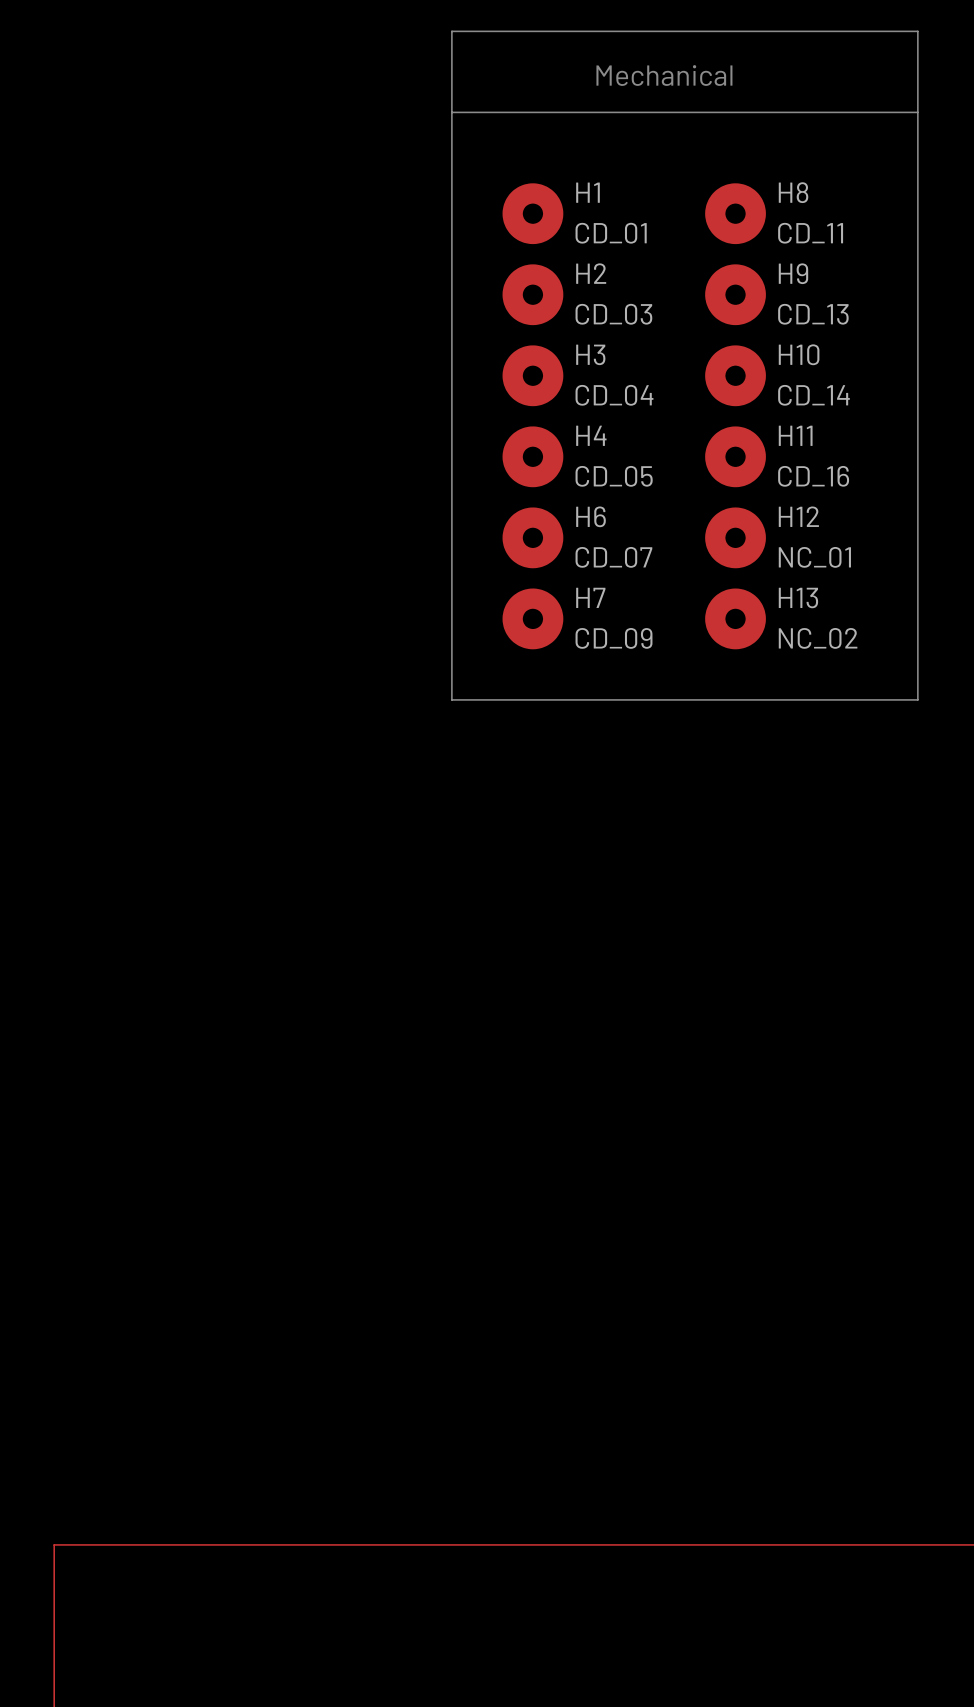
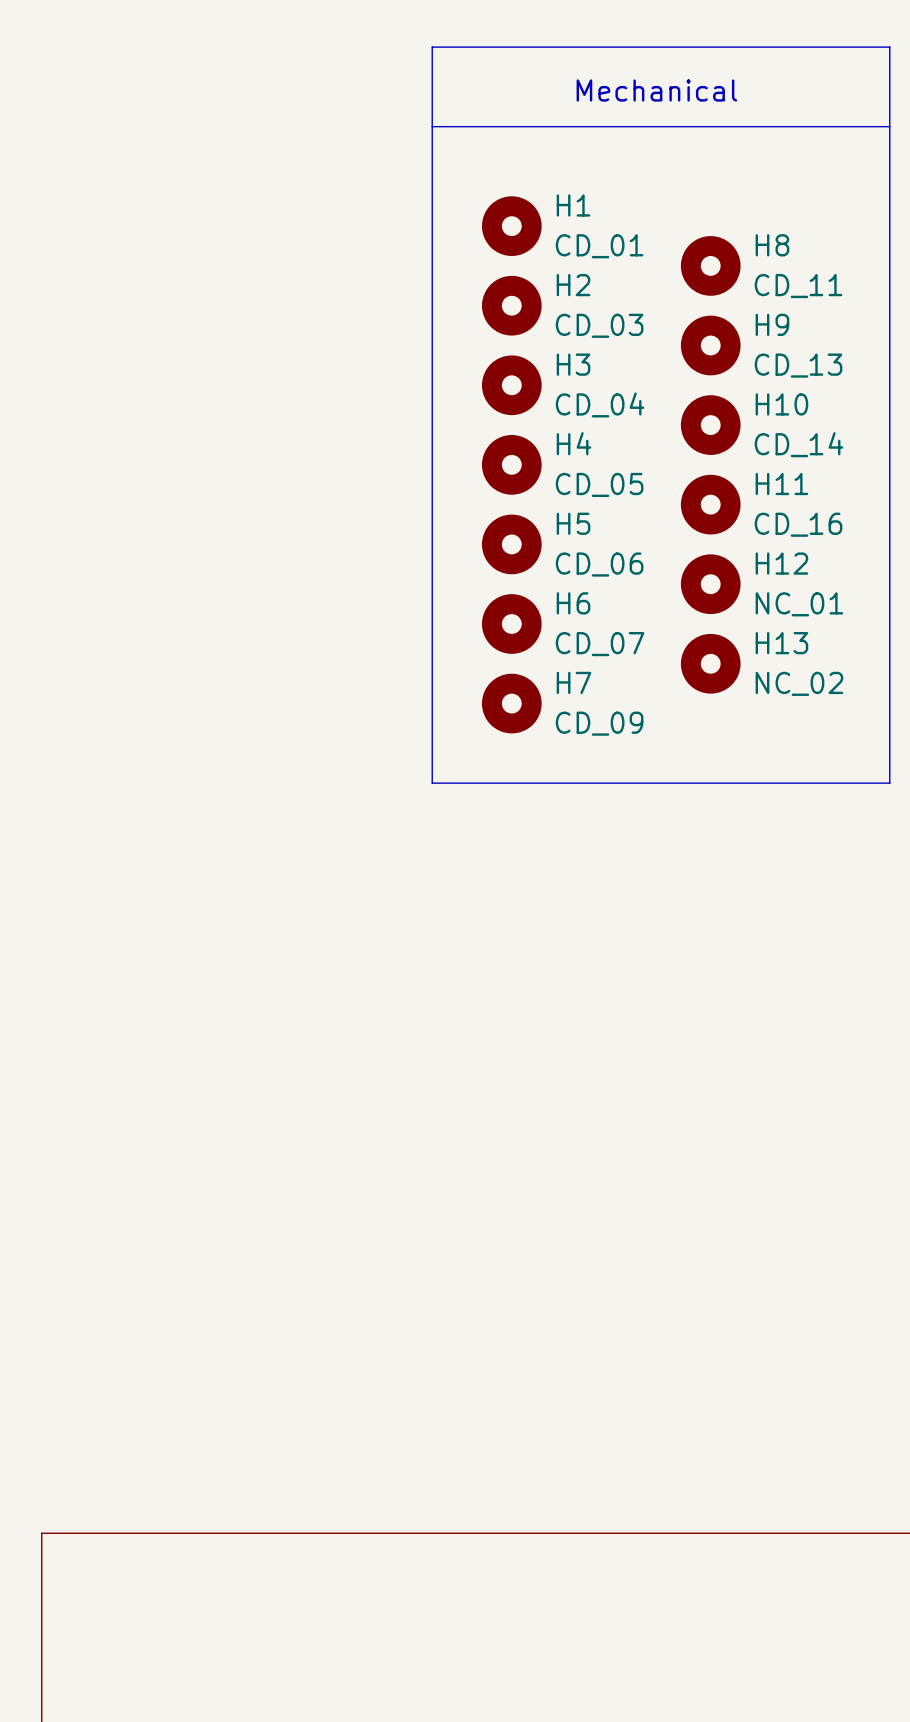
H8 position: (735, 213) -> (710, 265)
H9 position: (735, 294) -> (710, 345)
H10 position: (735, 375) -> (710, 425)
H11 position: (735, 456) -> (710, 504)
H6 name: H6 (591, 516) -> H5 (573, 523)
H12 position: (735, 537) -> (710, 584)
H6 value: CD_07 (613, 557) -> CD_06 (599, 564)
H7 name: H7 (590, 597) -> H6 (573, 603)
H13 position: (735, 618) -> (710, 663)
H7 value: CD_09 (614, 638) -> CD_07 (600, 644)
line: (451, 699) (917, 699) -> (432, 703) (432, 783) (889, 783) (889, 703)
H7: none -> CD_09 (511, 703)

